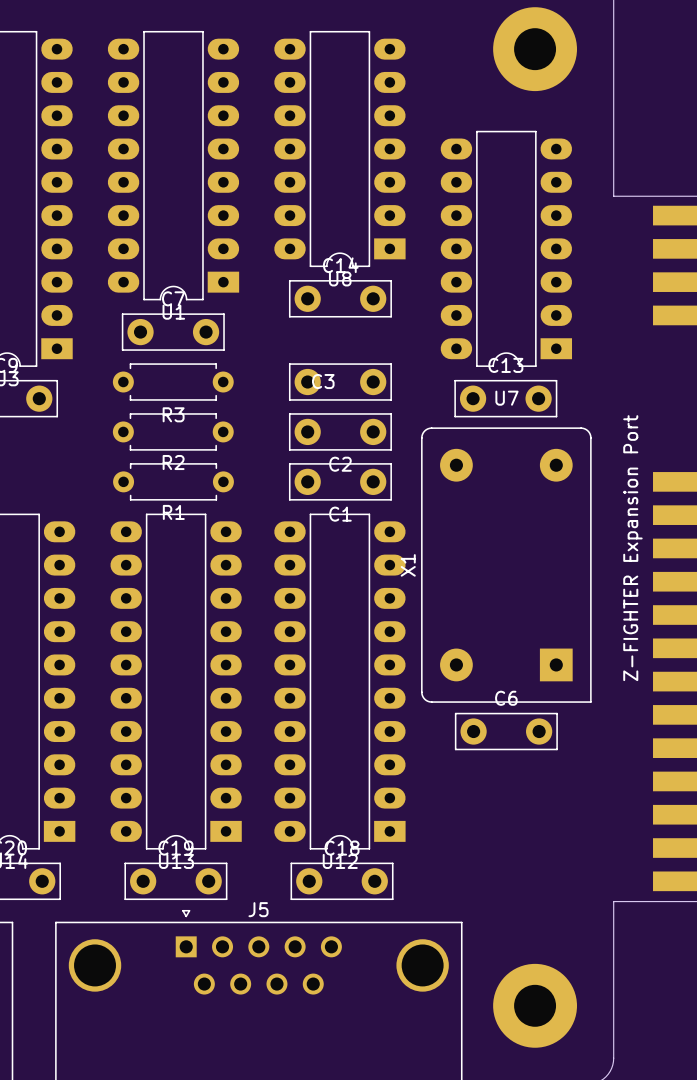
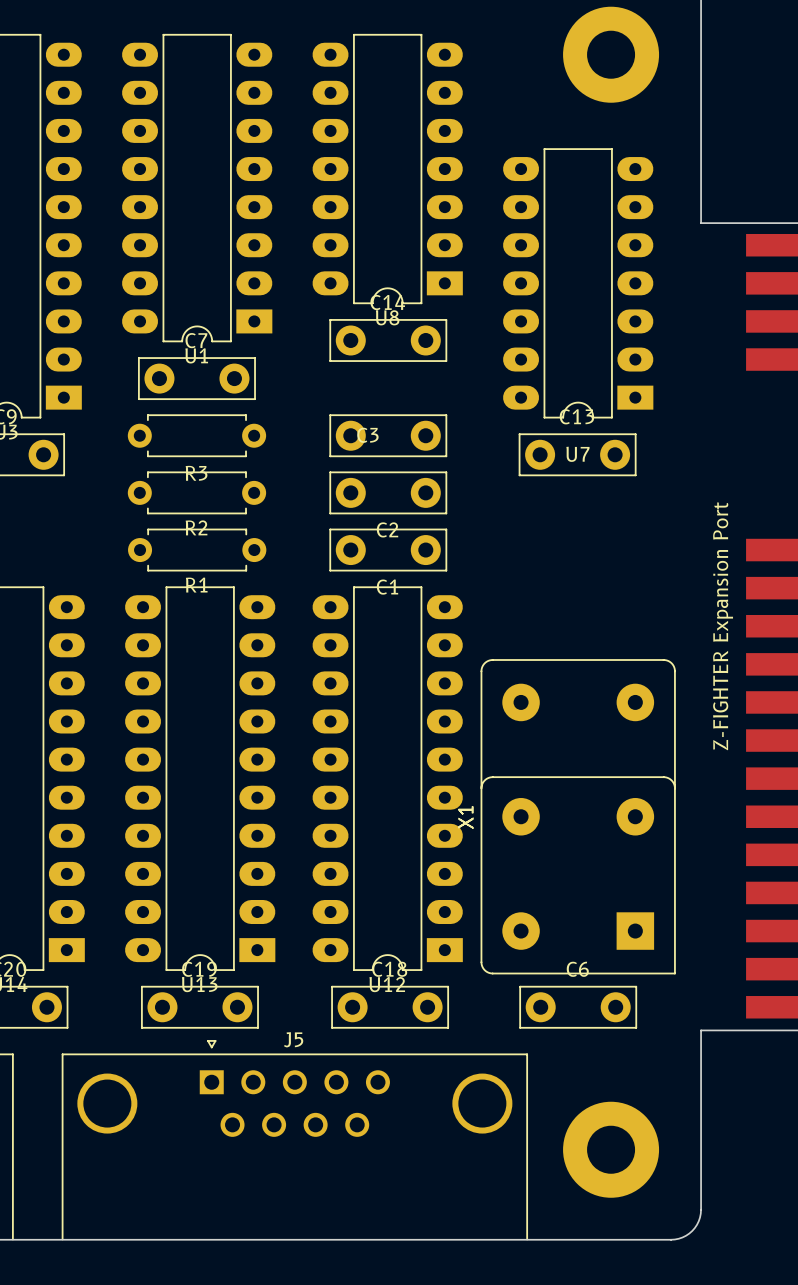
X1 position: (506, 565) -> (578, 816)
X1: none -> (578, 805)
C6 position: (506, 731) -> (578, 1007)

